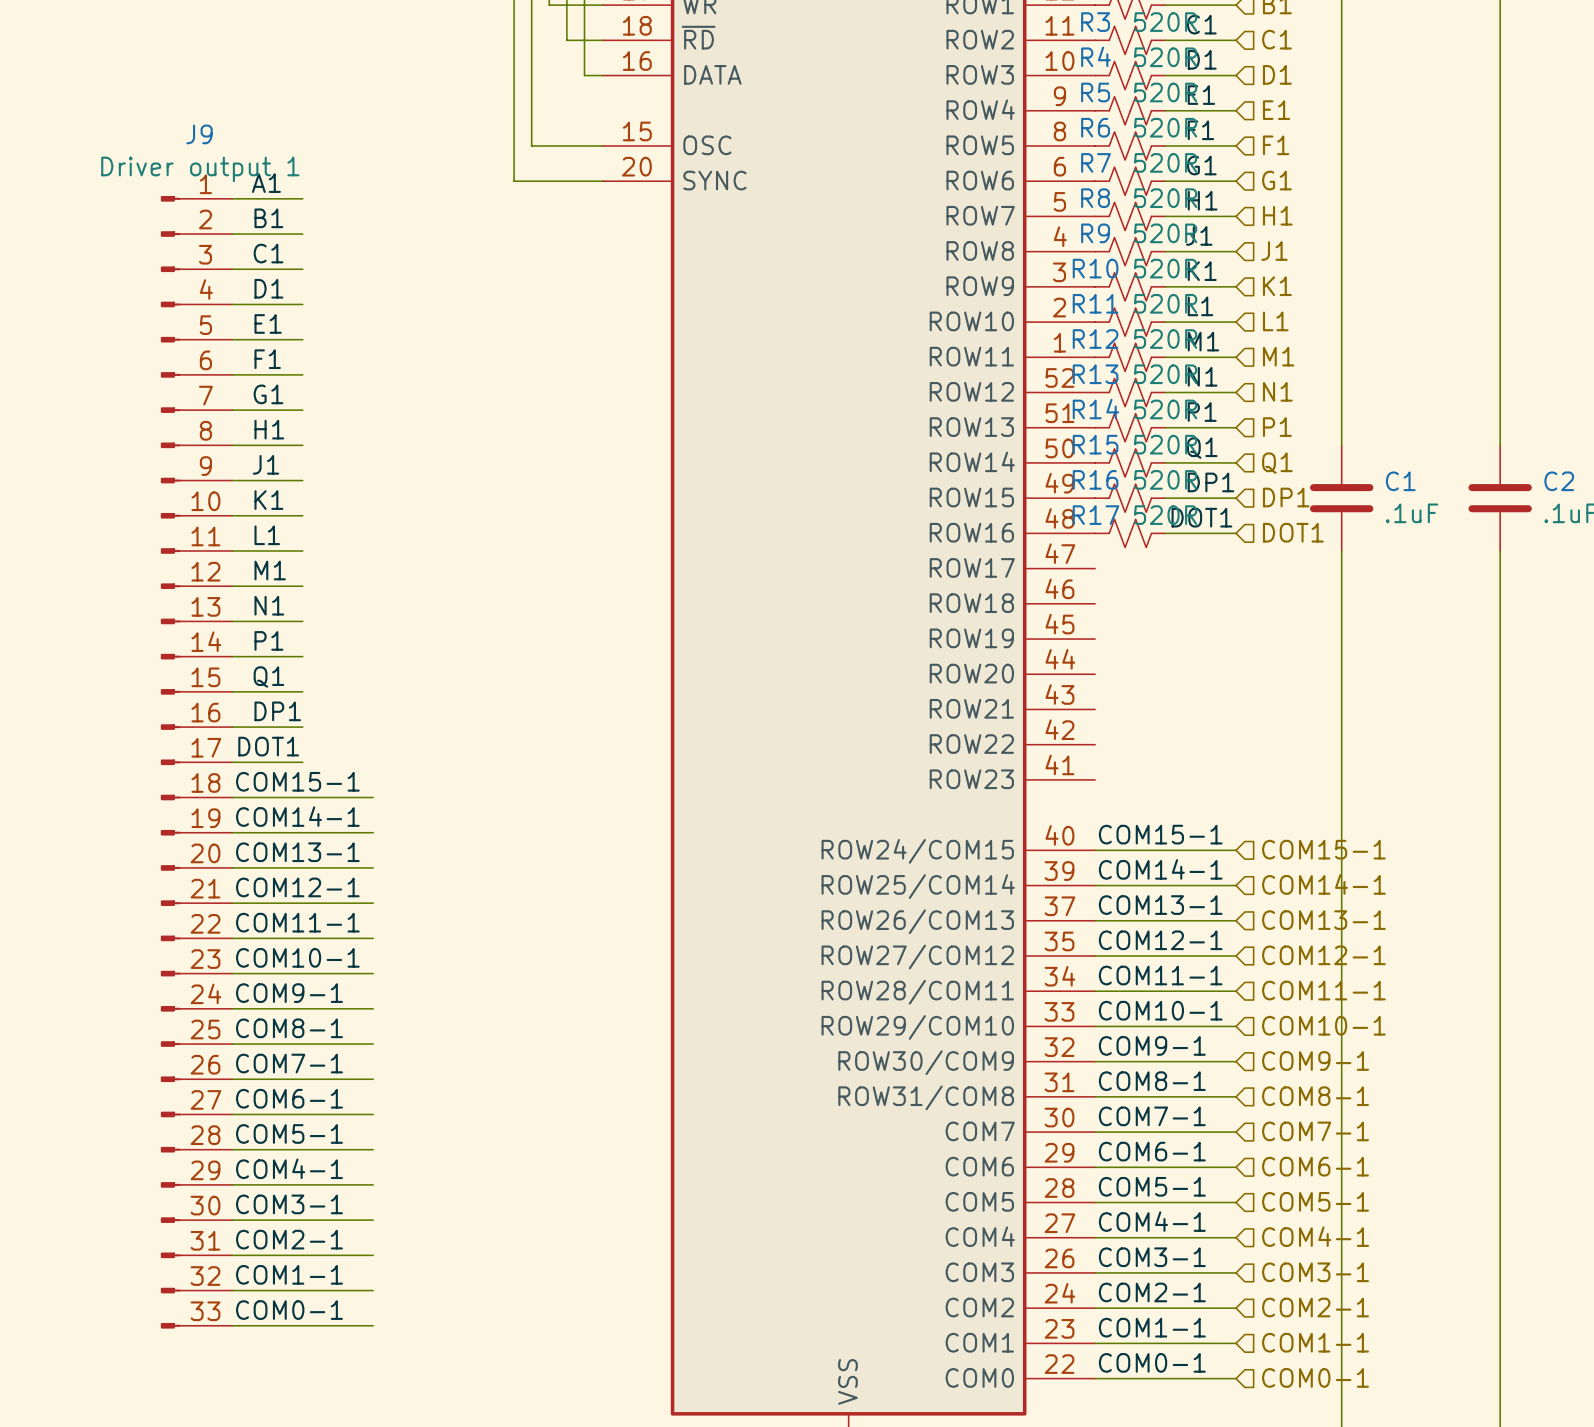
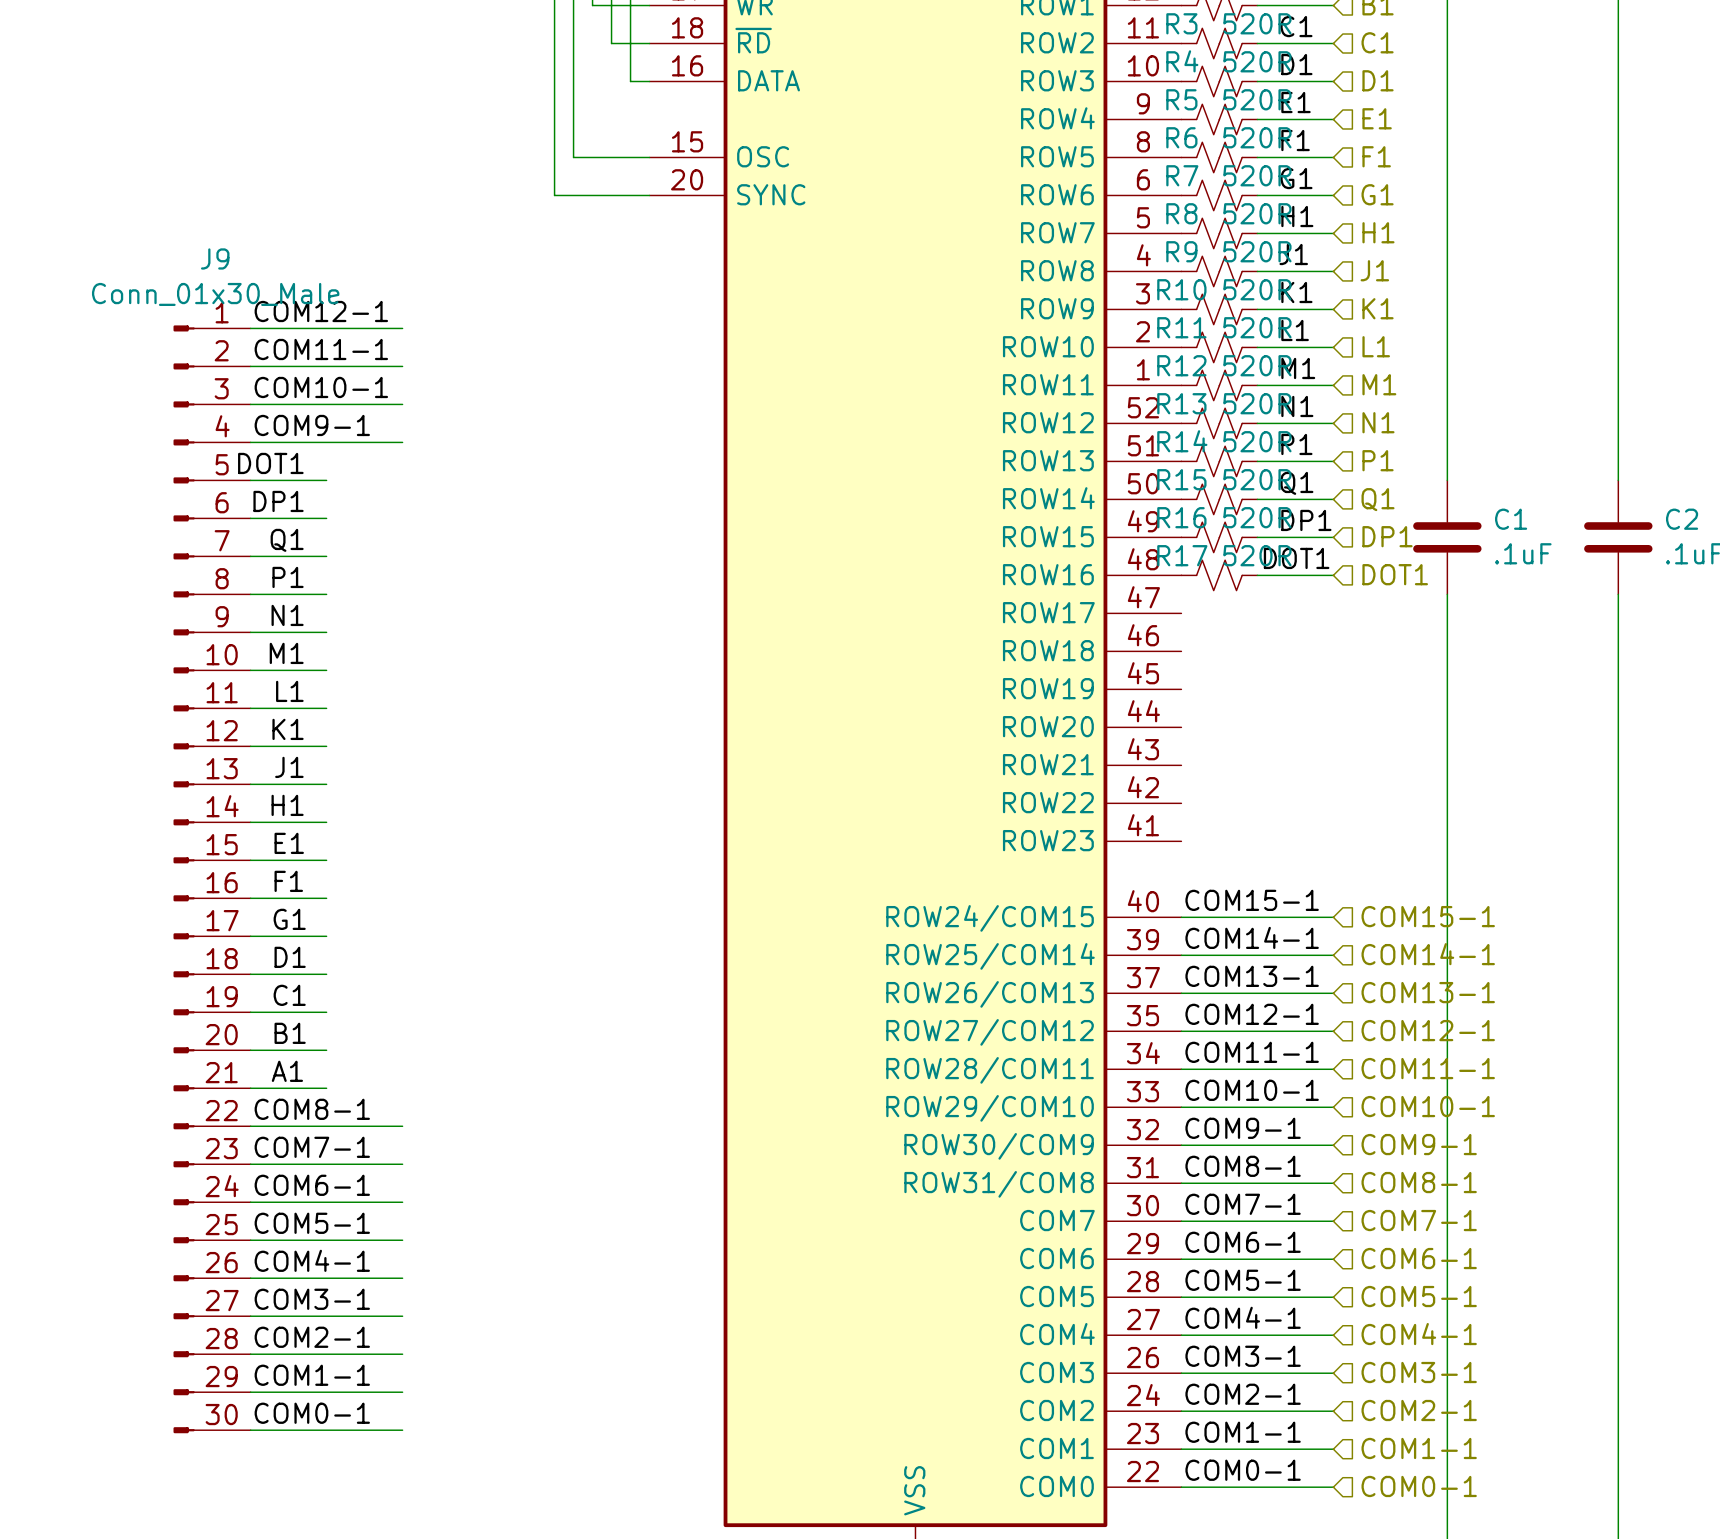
J9 name position: J9 (199, 134) -> J9 (215, 258)
J9 value: Driver output 1 (200, 169) -> Conn_01x30_Male (215, 294)
label: A1 (266, 183) -> none
J9 symbol: [160, 195, 233, 1329] -> [173, 325, 251, 1434]
wire: (232, 198) (302, 198) -> (326, 328) (402, 328)
label: B1 (268, 218) -> none
wire: (232, 234) (302, 234) -> (326, 366) (402, 366)
label: C1 (268, 253) -> none
wire: (232, 269) (302, 269) -> (326, 404) (402, 404)
label: D1 (268, 288) -> none
label: none -> COM12-1 (321, 311)
label: E1 (268, 323) -> none
label: none -> COM11-1 (321, 349)
label: F1 (267, 359) -> none
label: none -> COM10-1 (321, 387)
label: G1 (268, 394) -> none
label: none -> COM9-1 (312, 425)
wire: none -> (326, 442) (402, 442)
label position: H1 (269, 429) -> H1 (287, 805)
label position: J1 (266, 464) -> J1 (289, 767)
label position: K1 (268, 500) -> K1 (288, 729)
label position: L1 (267, 535) -> L1 (289, 691)
label position: M1 (270, 570) -> M1 (286, 653)
label position: N1 (269, 605) -> N1 (287, 615)
label position: P1 (268, 640) -> P1 (288, 577)
label position: Q1 (268, 676) -> Q1 (287, 540)
label position: DP1 (277, 711) -> DP1 (278, 501)
label position: DOT1 (268, 746) -> DOT1 (270, 463)
label: none -> E1 (289, 843)
label: COM15-1 (297, 781) -> none
wire: (302, 797) (373, 797) -> none
label: COM14-1 (297, 816) -> none
label: none -> F1 (288, 881)
wire: (302, 832) (373, 832) -> none
label: none -> G1 (289, 919)
label: COM13-1 (297, 852) -> none
wire: (302, 867) (373, 867) -> none
label: none -> D1 (290, 957)
label: COM12-1 (297, 887) -> none
wire: (302, 903) (373, 903) -> none
label: none -> C1 (289, 995)
label: COM11-1 (297, 922) -> none
wire: (302, 938) (373, 938) -> none
label: none -> B1 (290, 1033)
label: COM10-1 (297, 957) -> none
wire: (302, 973) (373, 973) -> none
label: none -> A1 (287, 1071)
label: COM9-1 (289, 993) -> none
wire: (302, 1008) (373, 1008) -> none

